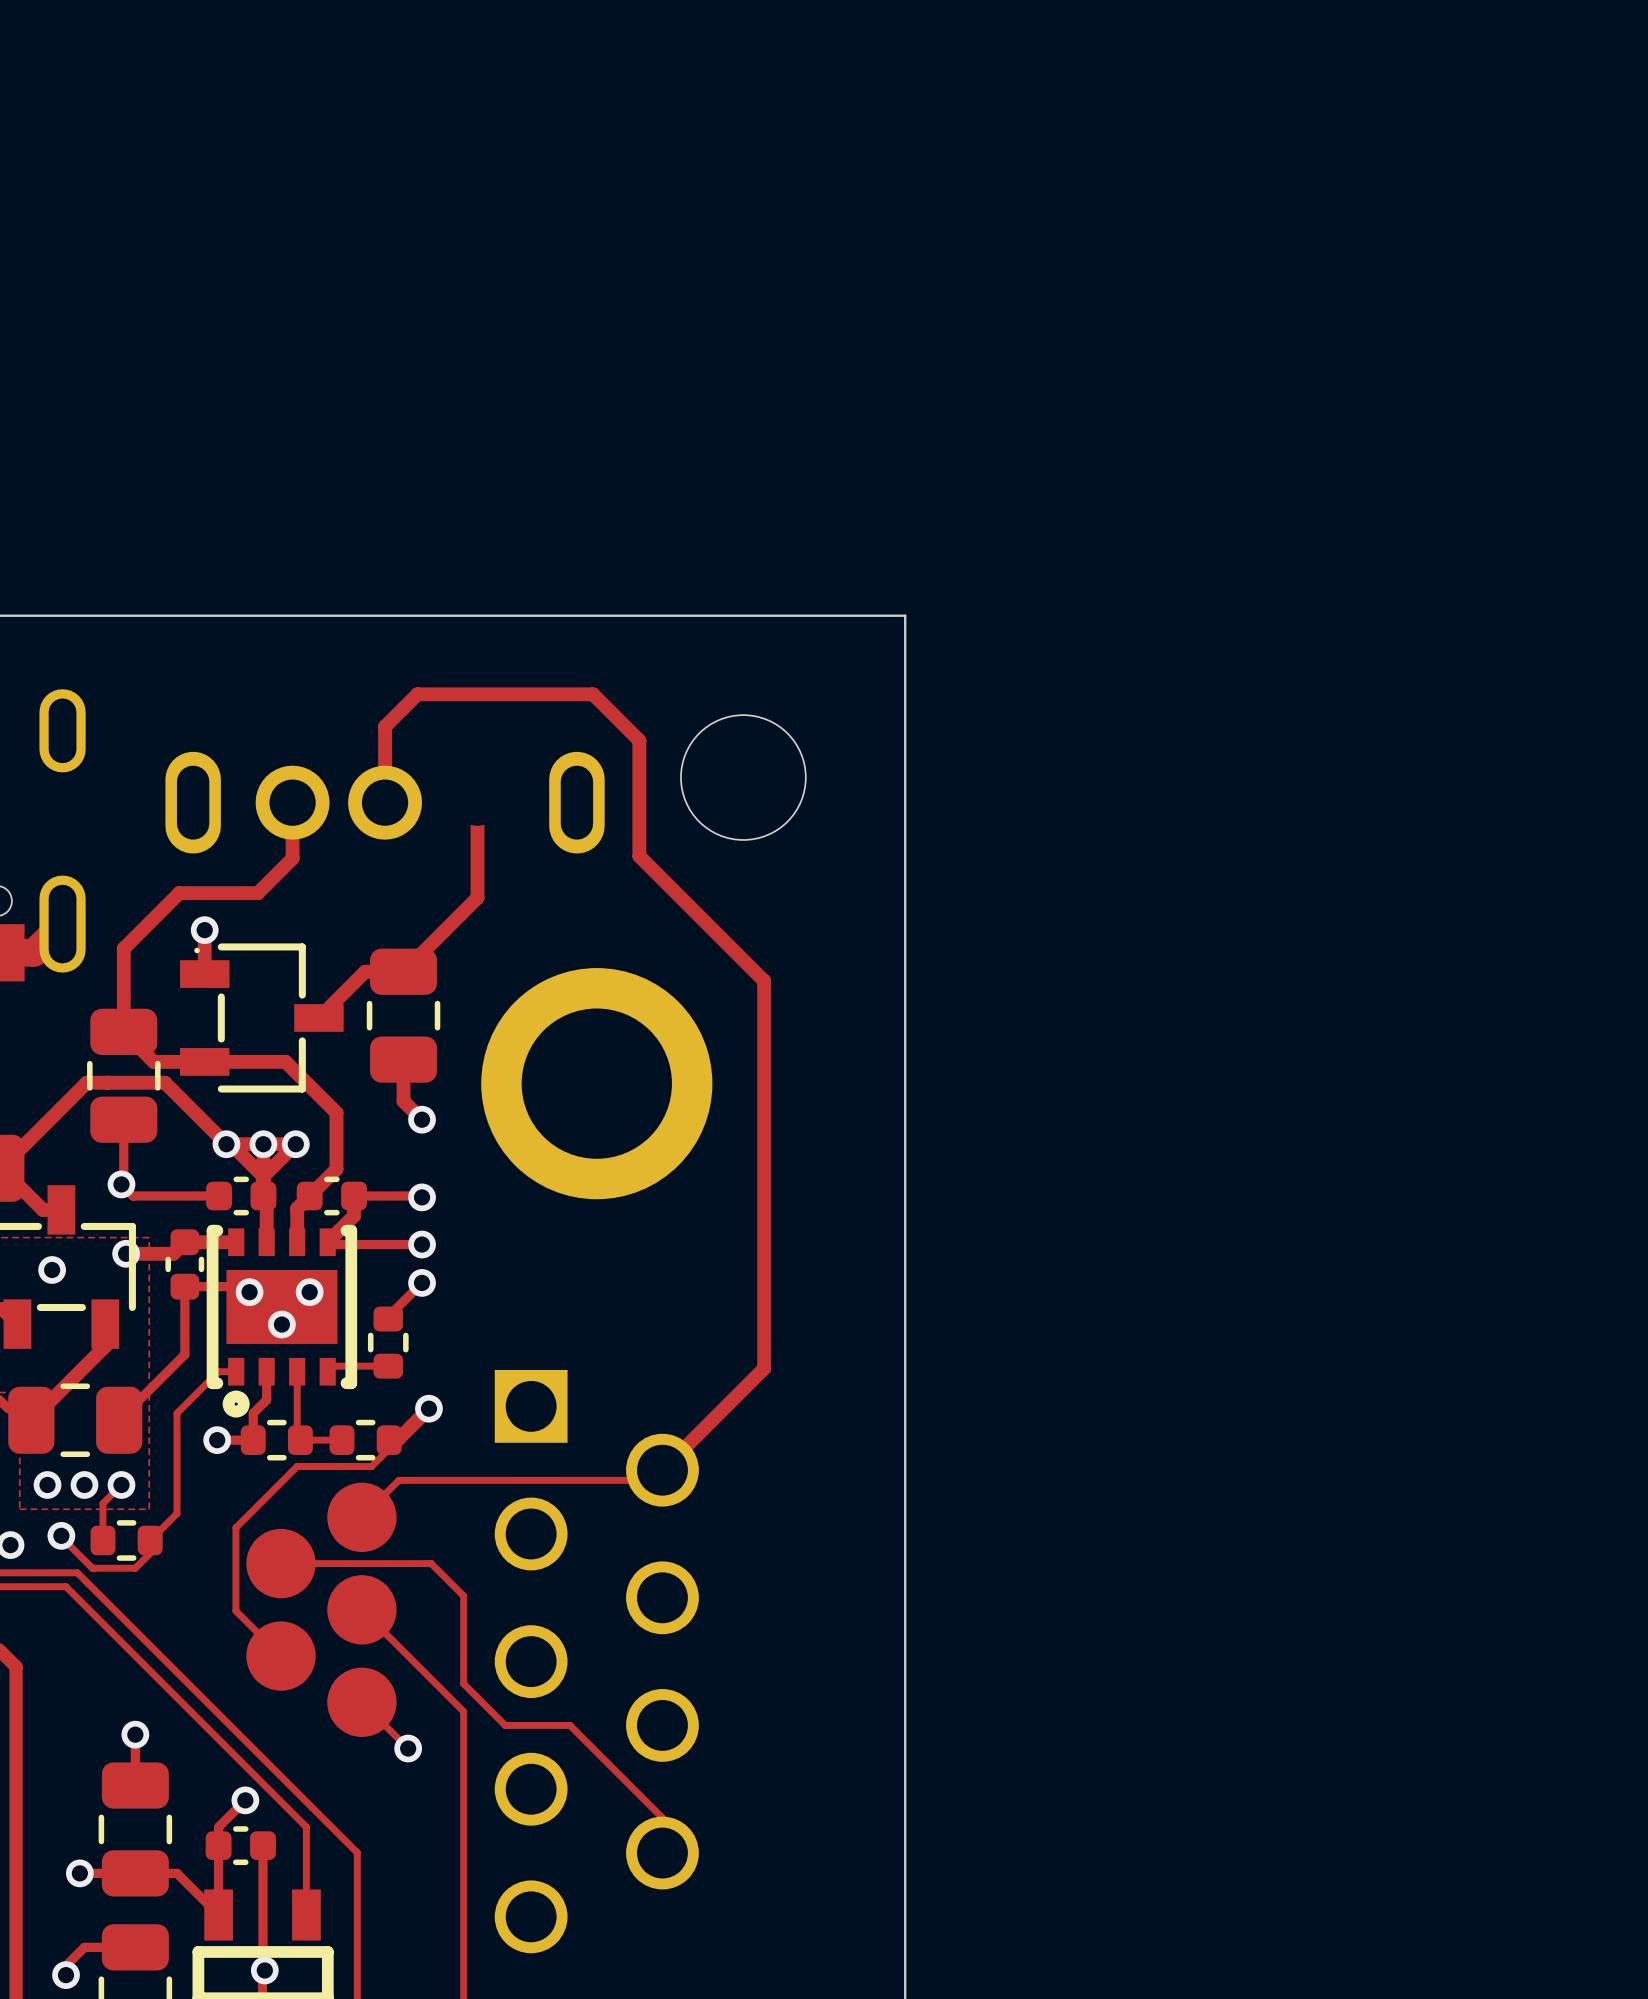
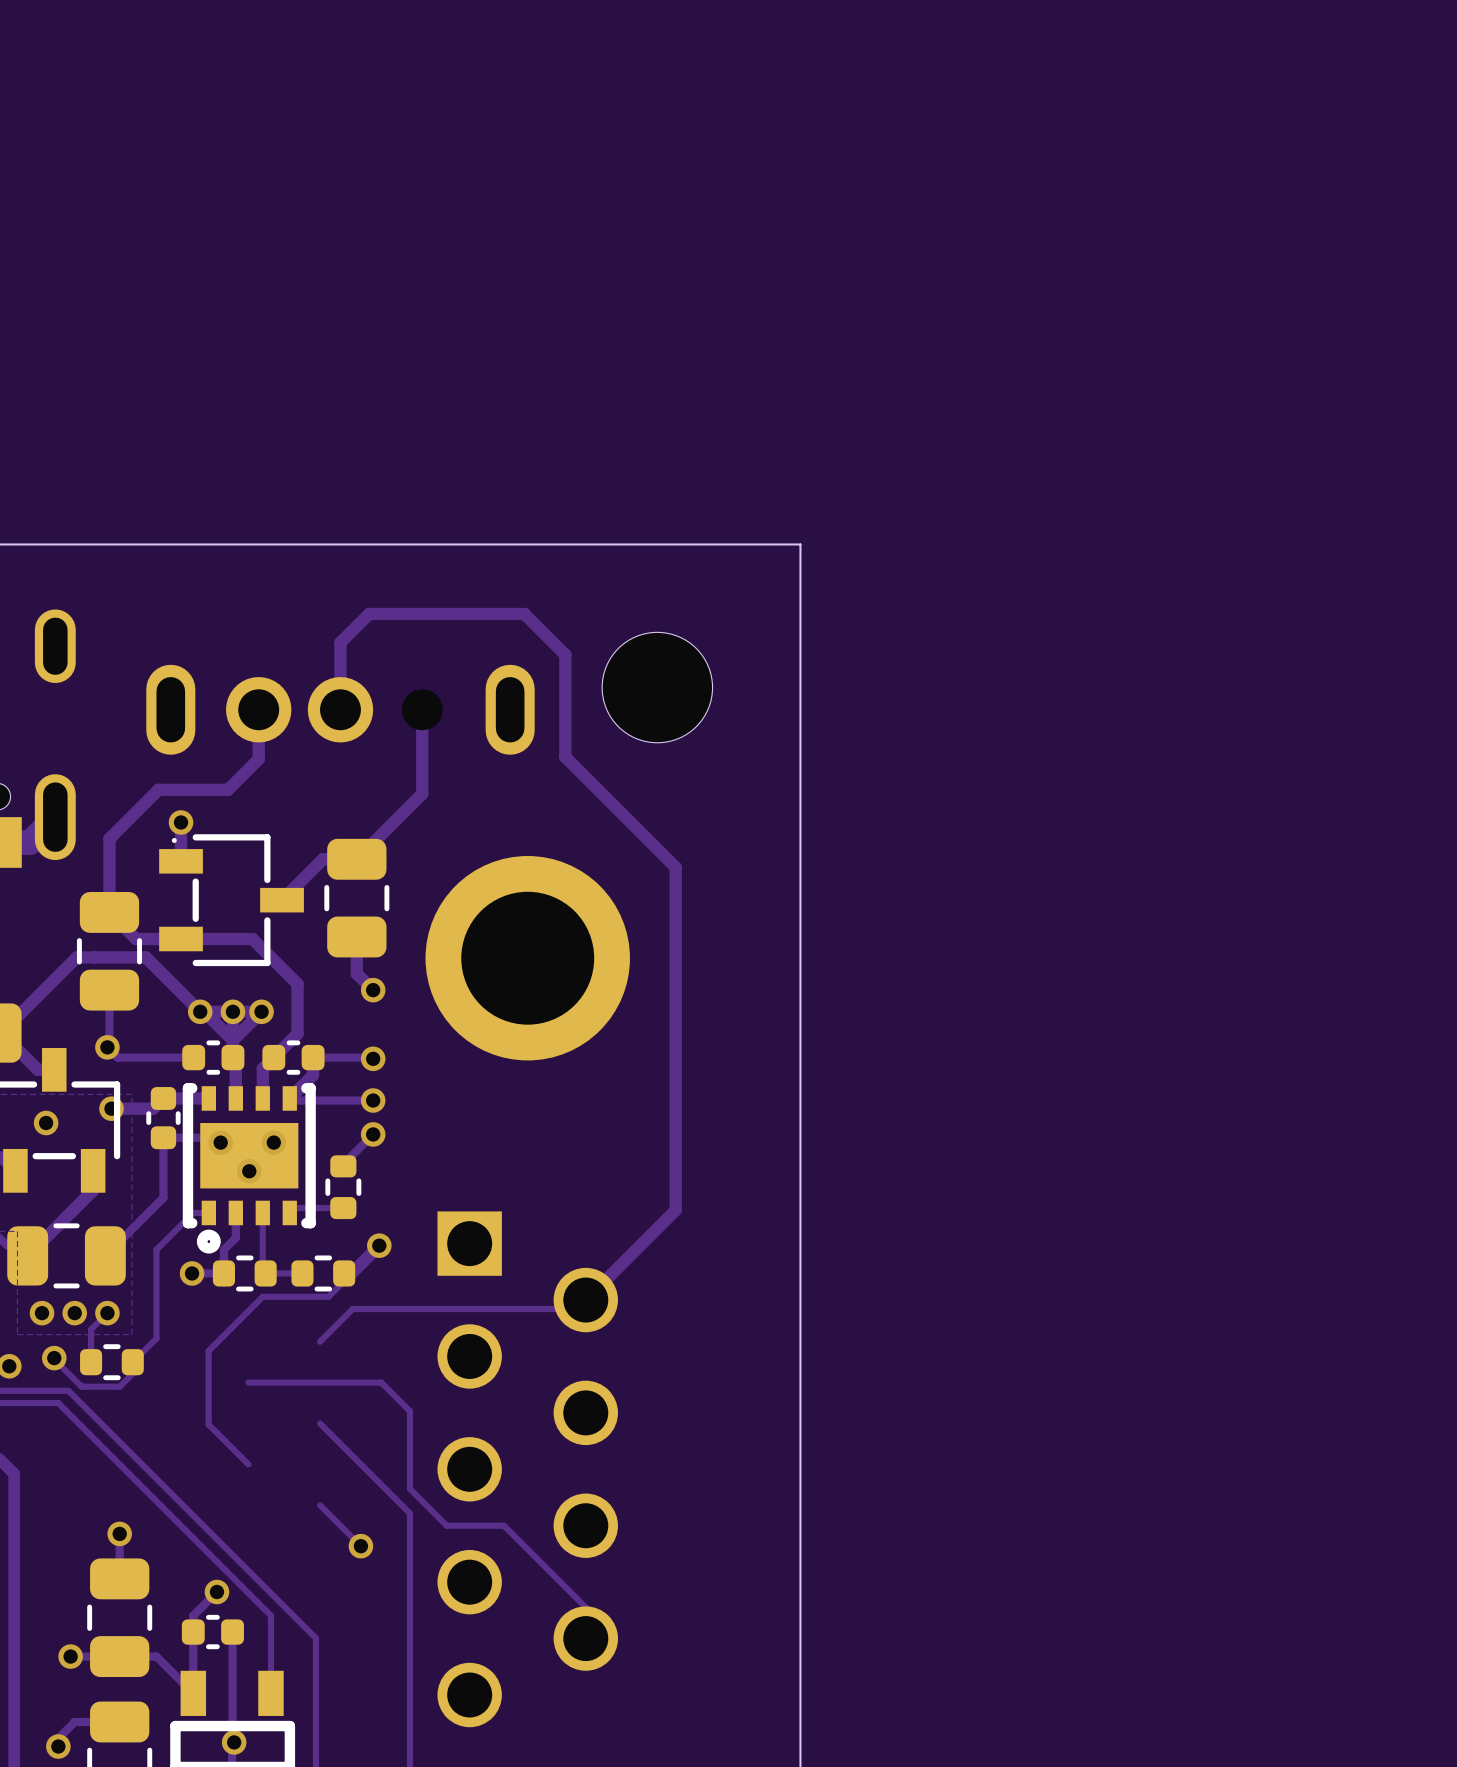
part: (361, 1517) -> none
part: (281, 1563) -> none
part: (361, 1609) -> none
part: (281, 1656) -> none
part: (361, 1702) -> none

